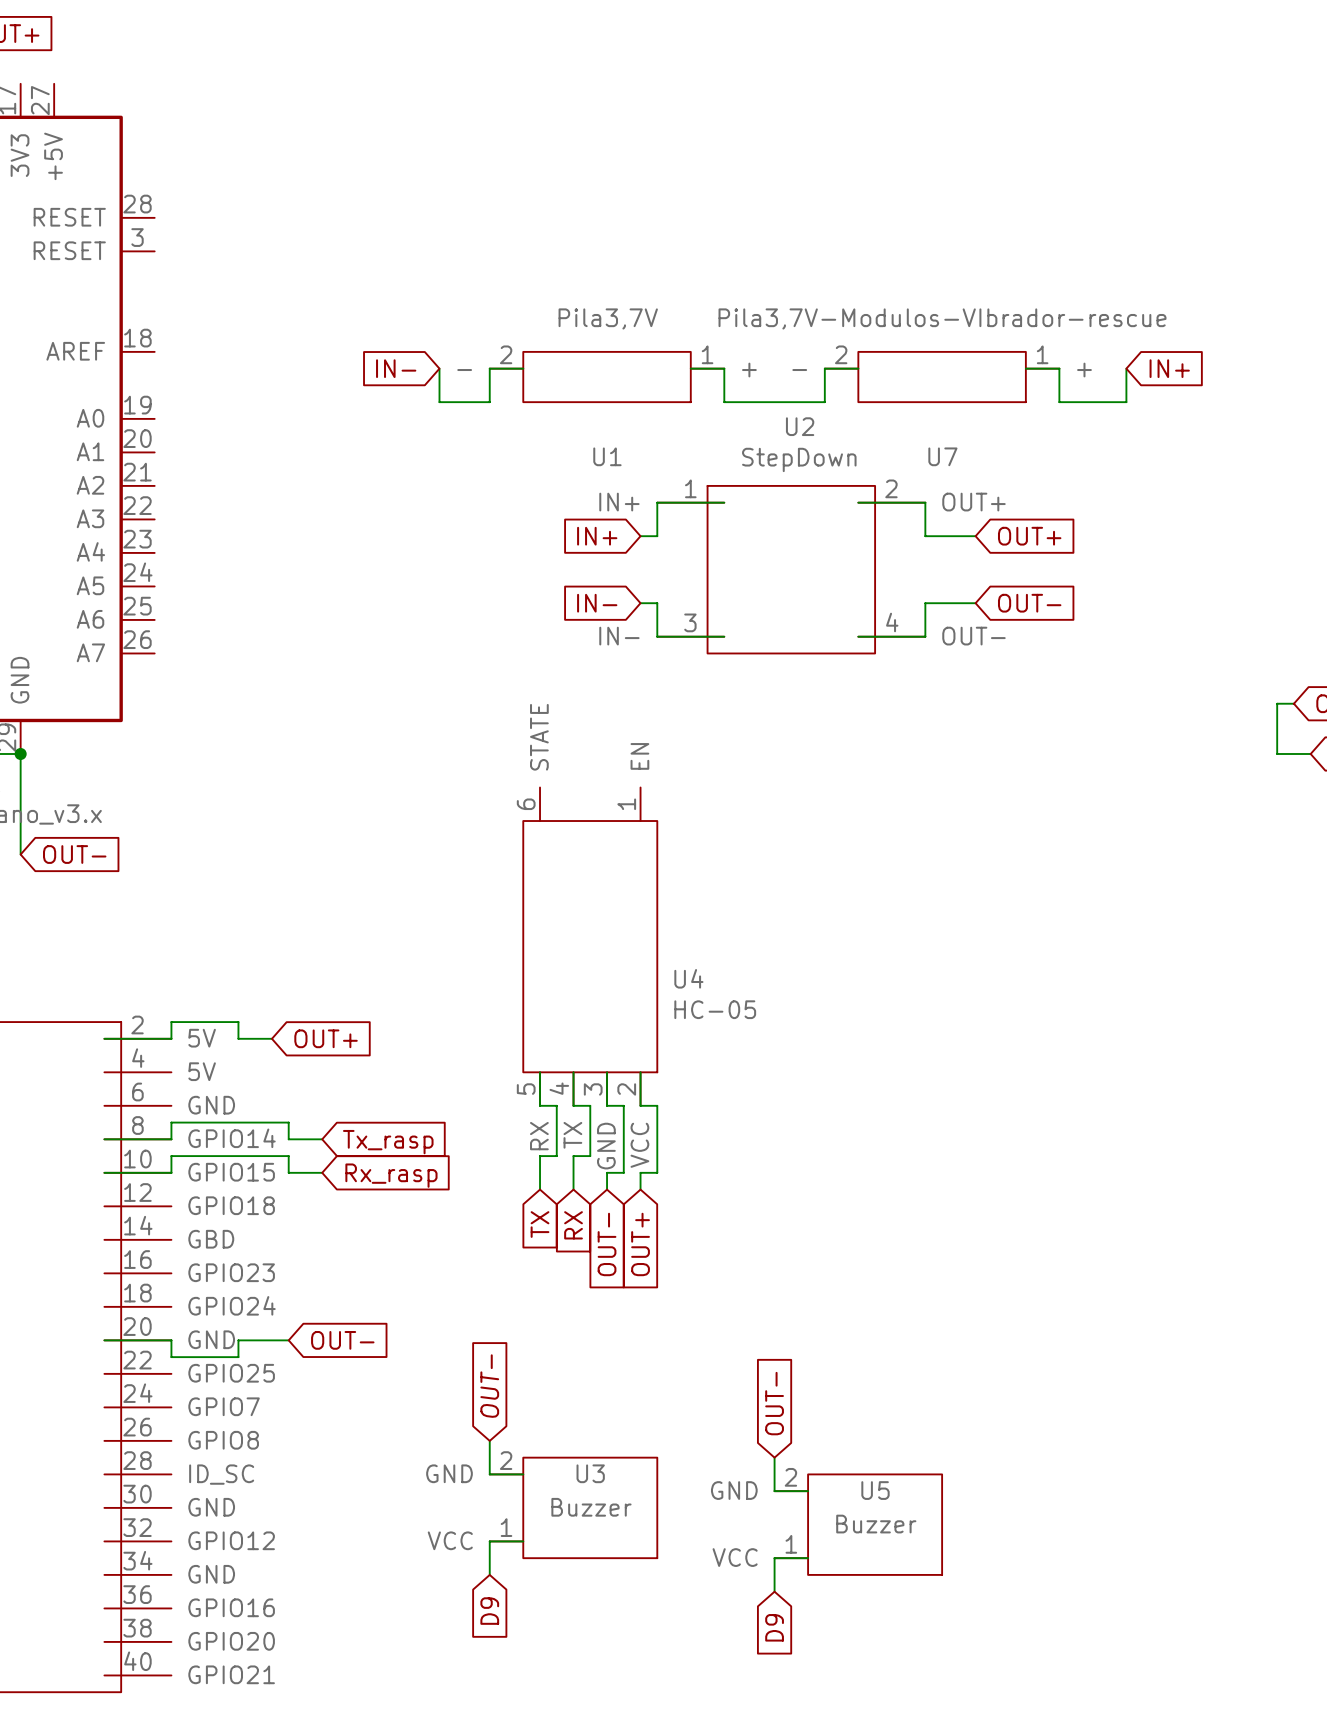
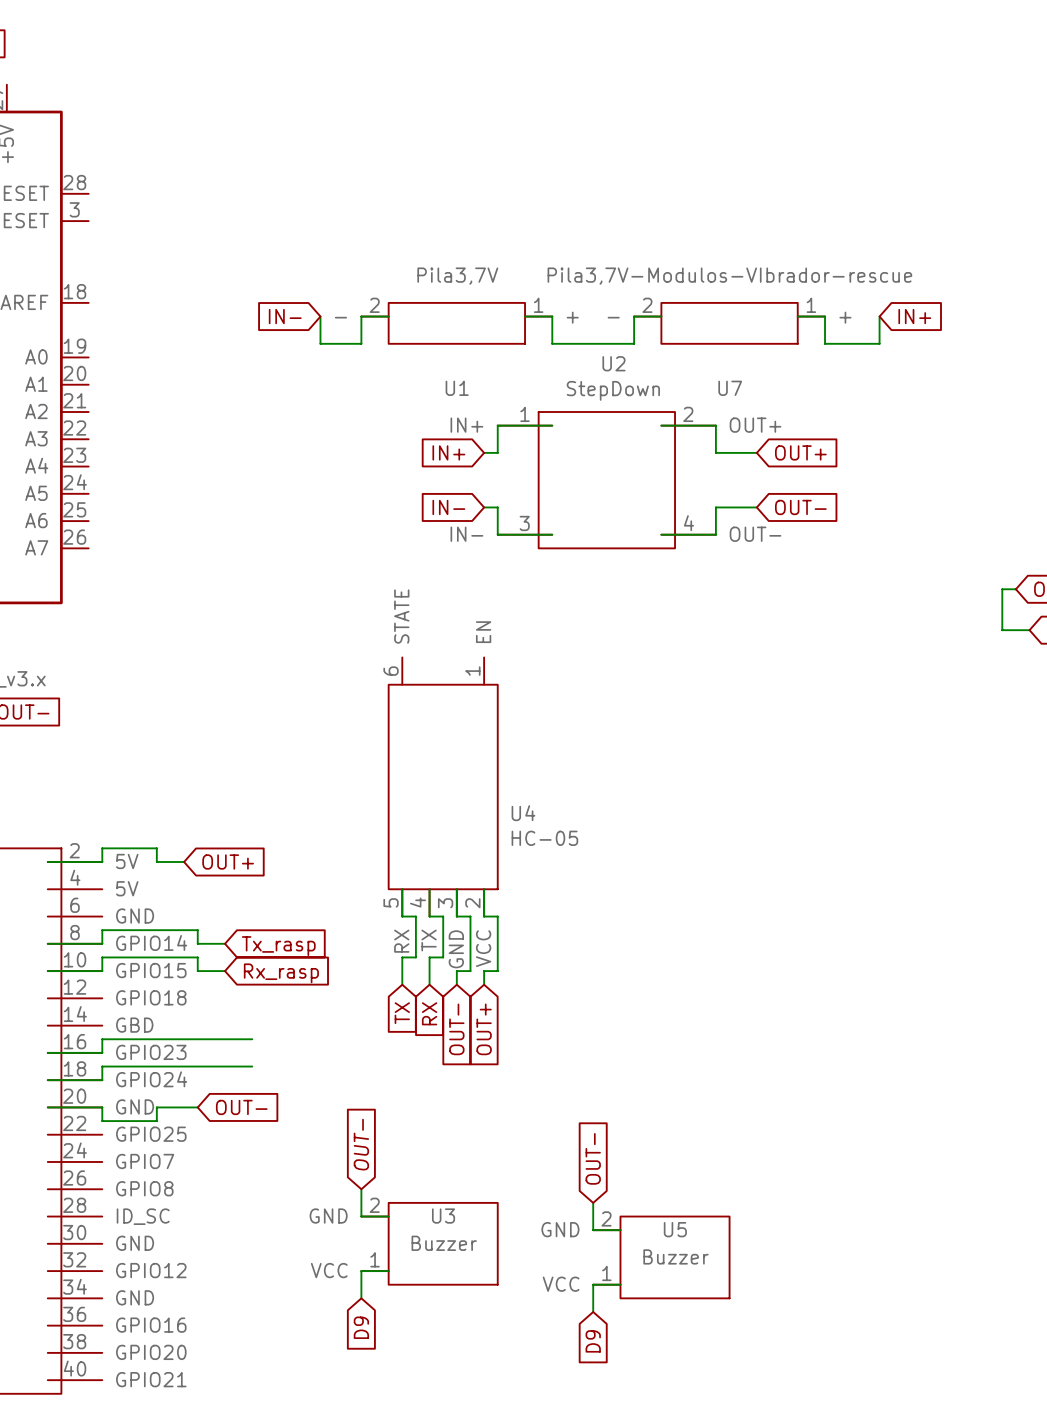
wire: none -> (252, 1039) (102, 1039) (102, 1052) (47, 1052)
wire: none -> (252, 1066) (102, 1066) (102, 1080) (47, 1080)

